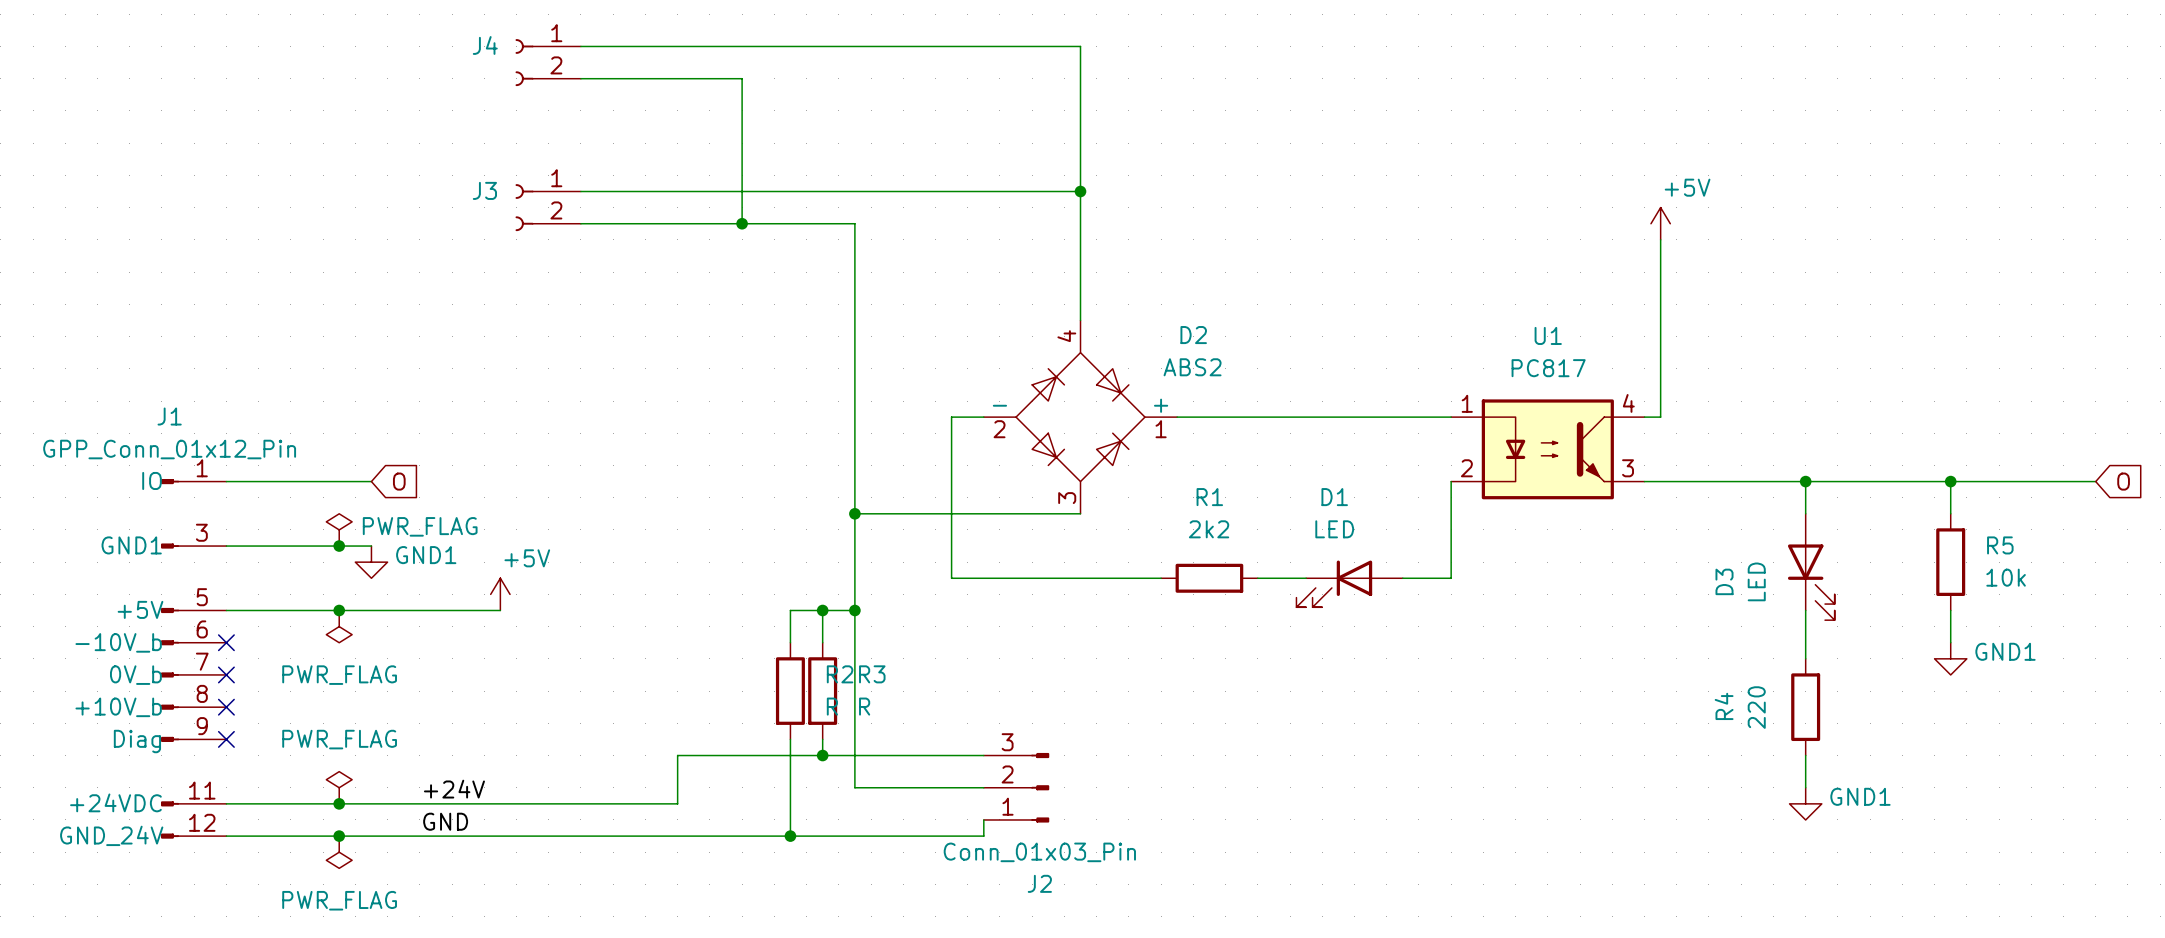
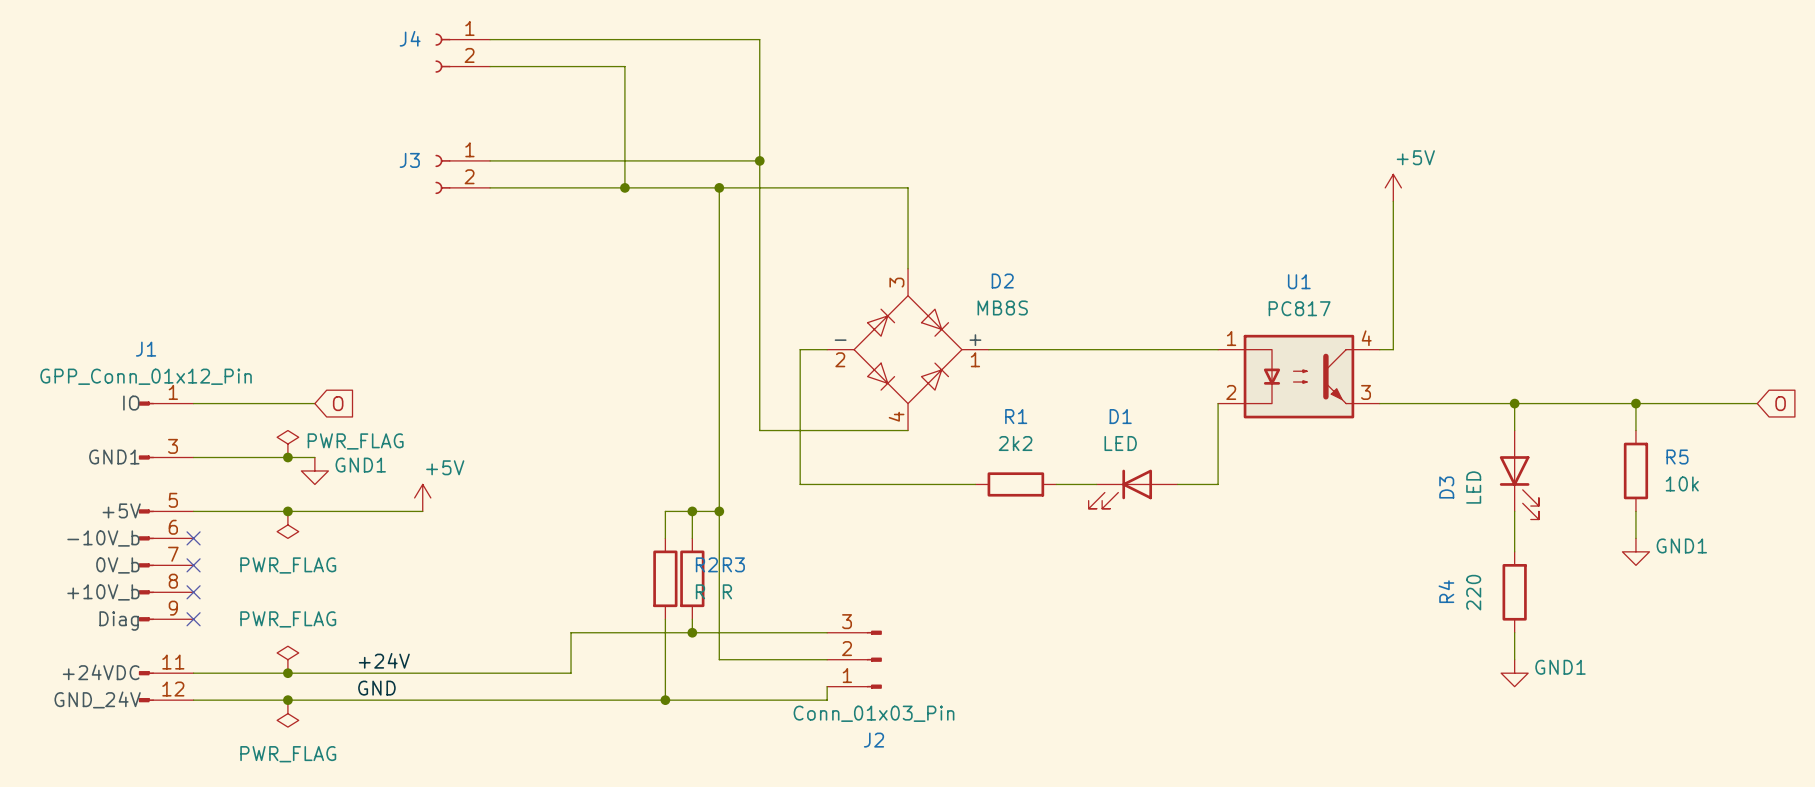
wire: (903, 46) (1080, 46) (1080, 223) -> (719, 187) (908, 187)
wire: (903, 191) (1080, 191) -> none
junction: none -> (759, 160)
junction: (1080, 191) -> none
junction: none -> (719, 187)
D2 value: ABS2 (1192, 367) -> MB8S (1002, 307)
D2 flip: as is (1080, 417) -> up-down (908, 349)
wire: (854, 513) (903, 513) -> (759, 39) (759, 430)
junction: (854, 513) -> none

